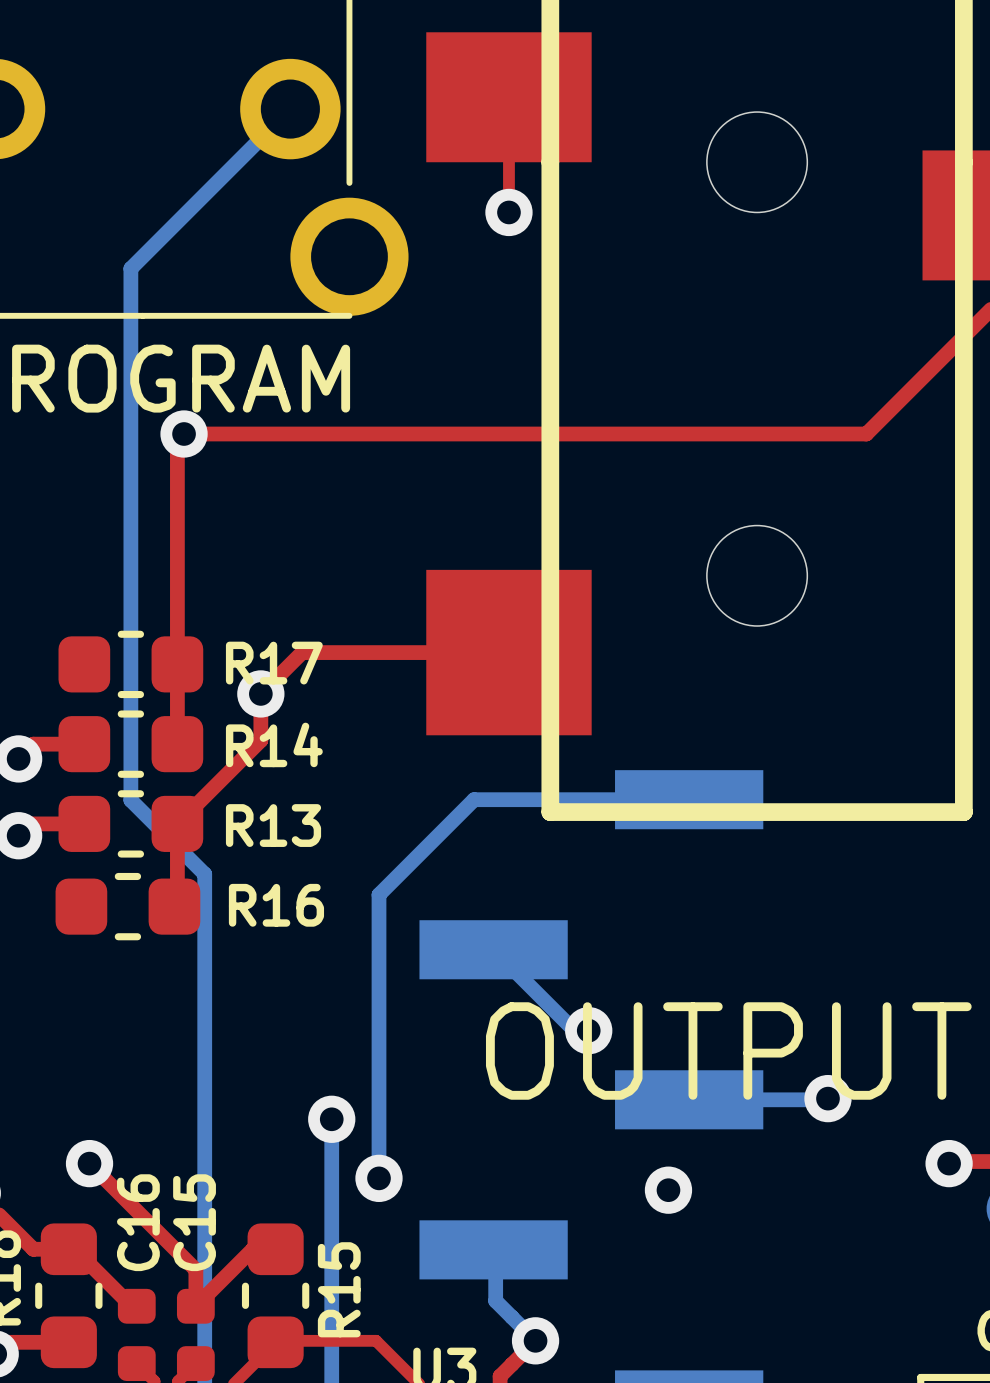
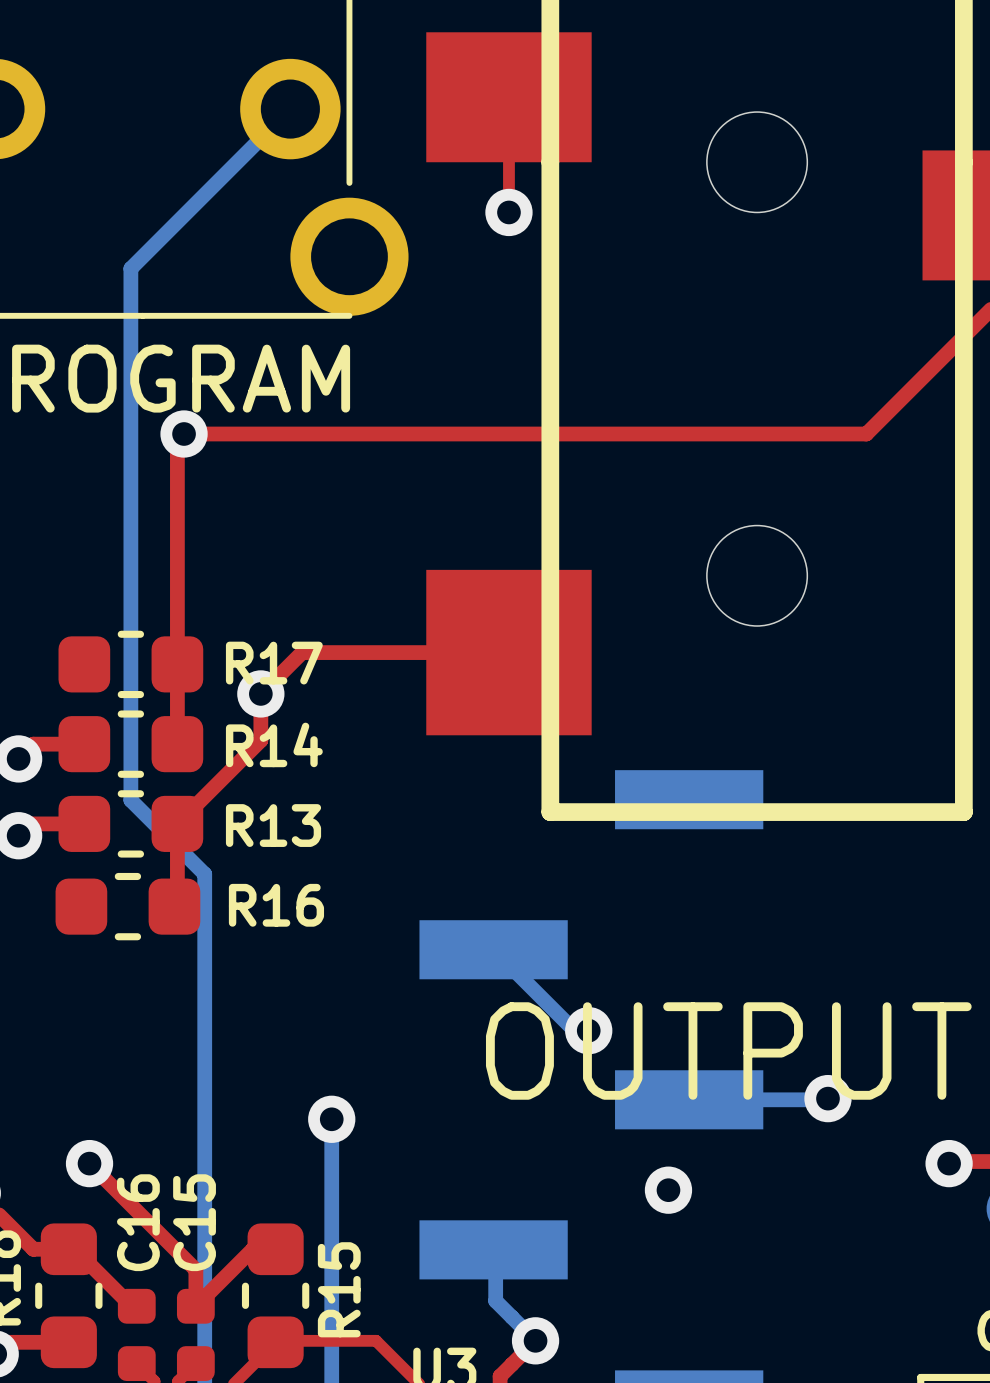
bottom track: (689, 799) (474, 799) (379, 894) (379, 1178) -> none
via: (379, 1178) -> none

